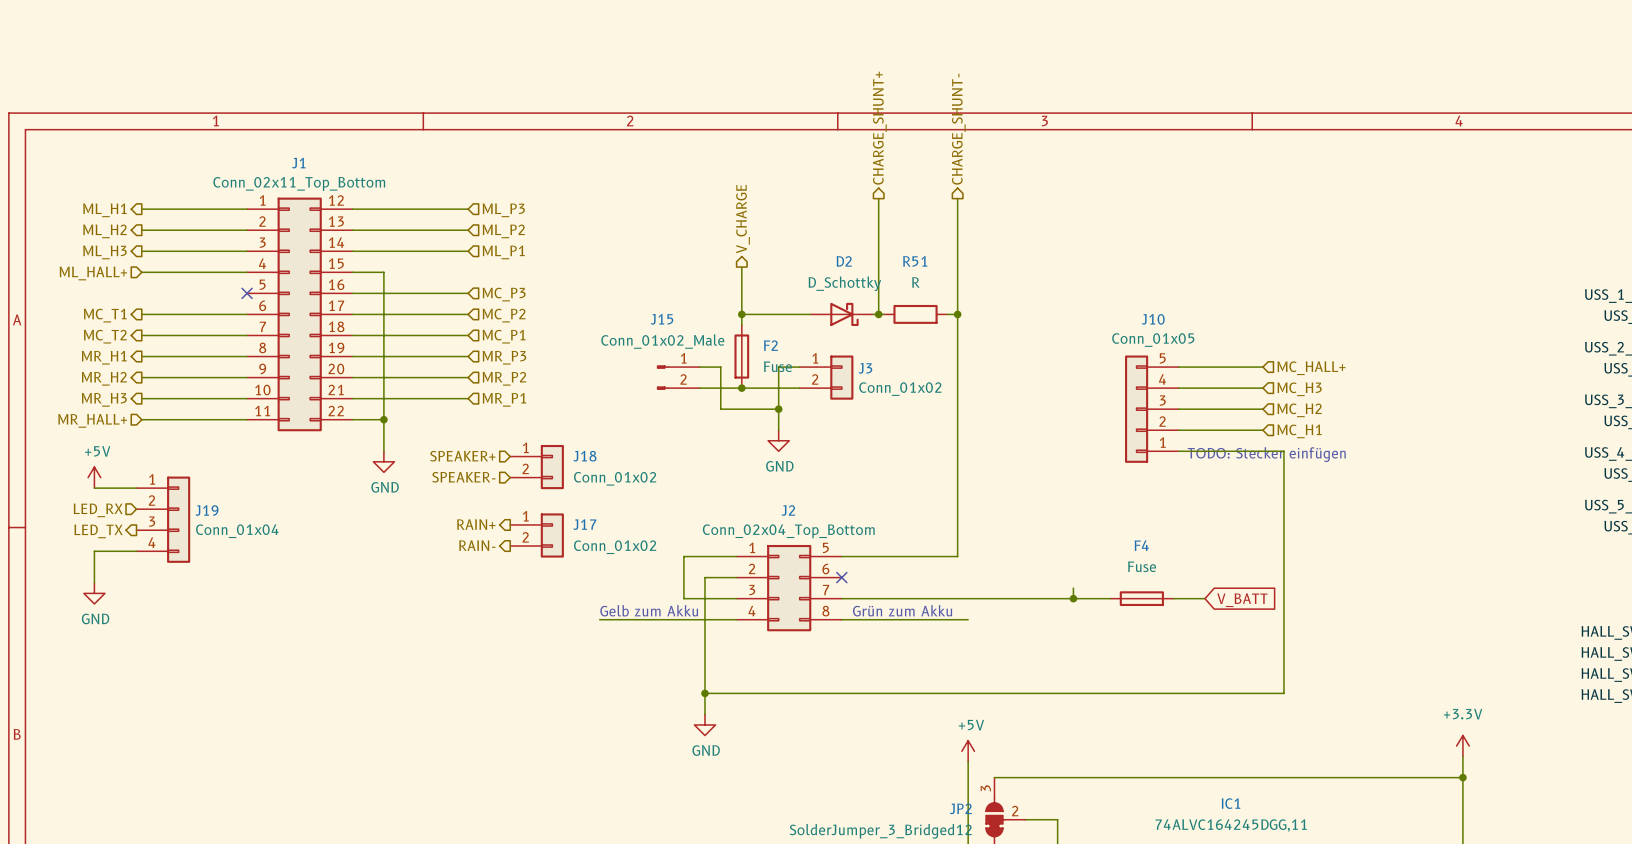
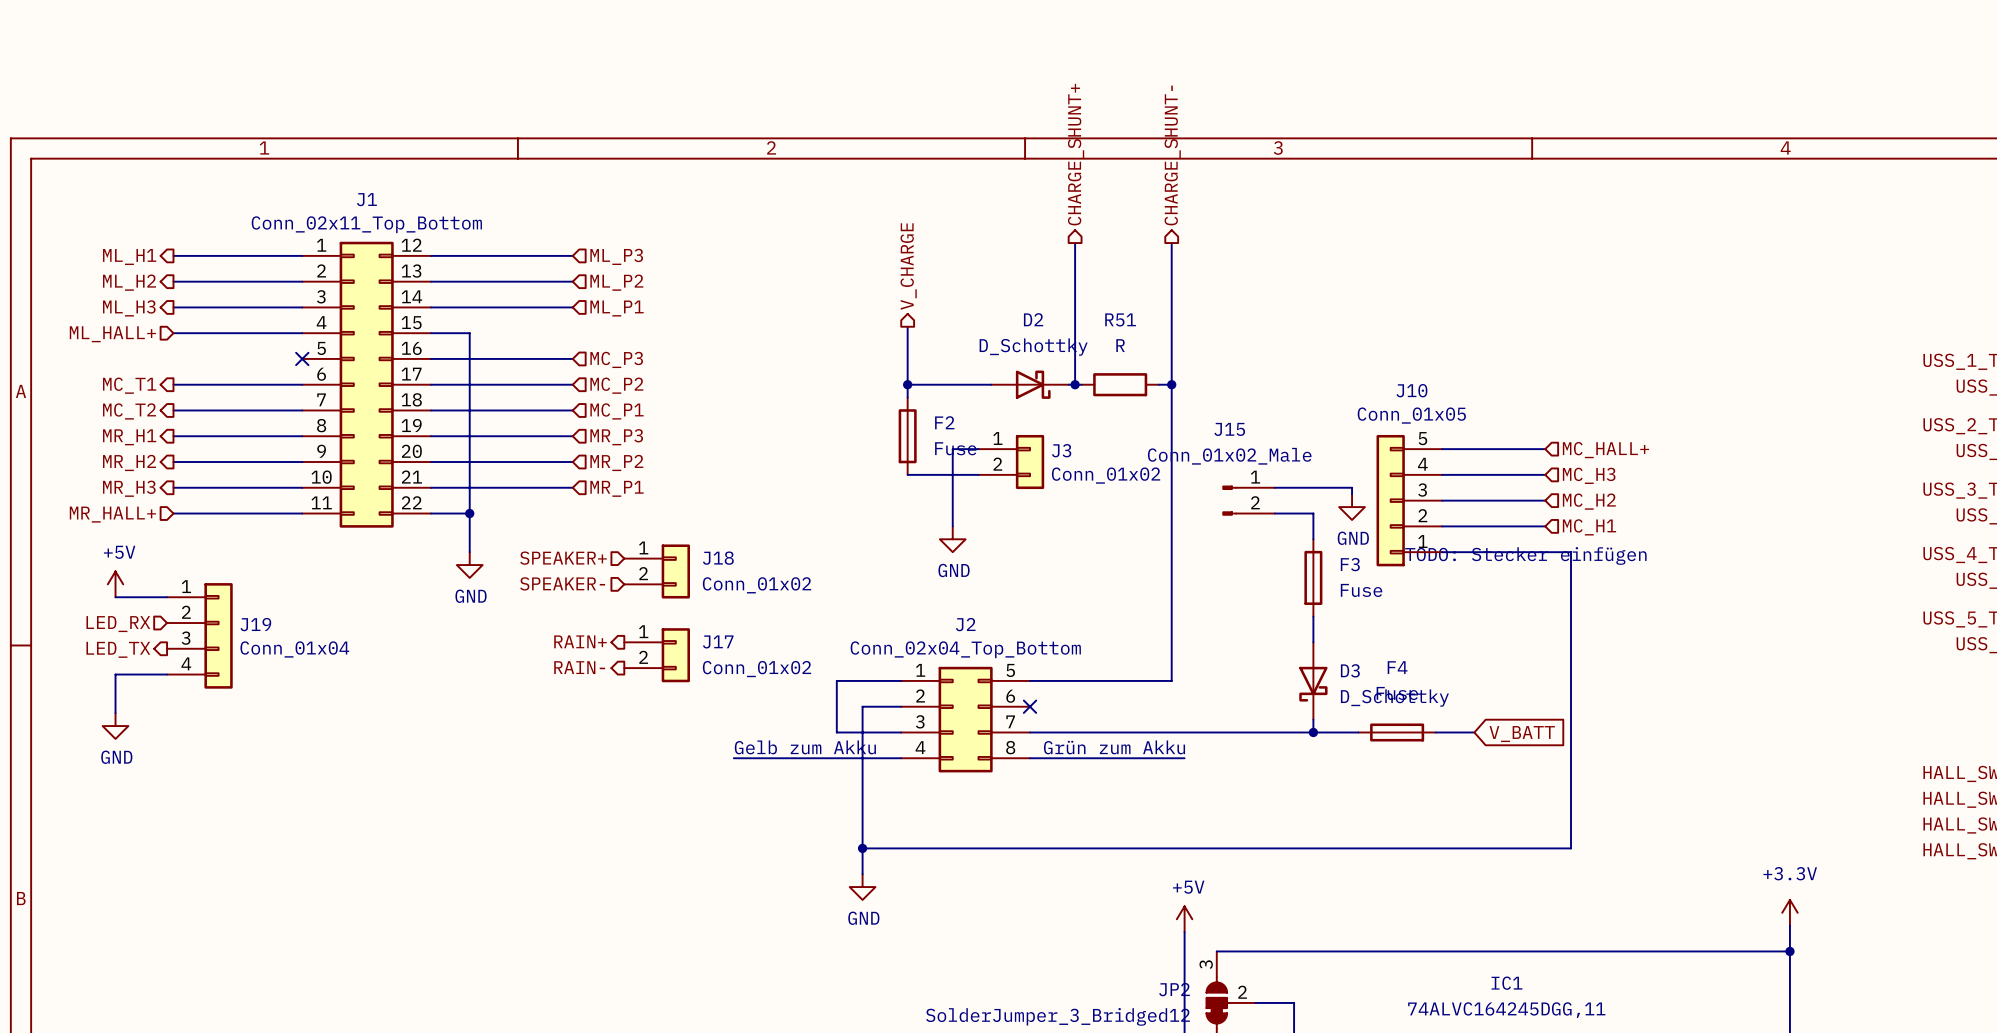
wire: (699, 367) (720, 367) (720, 409) (778, 409) -> none
J15 position: (678, 377) -> (1248, 500)
wire: (699, 388) (741, 388) -> none
junction: (741, 388) -> none
wire: none -> (1274, 487) (1352, 487) (1352, 494)
junction: (778, 409) -> none
power symbol: none -> GND (1352, 507)
wire: none -> (1274, 513) (1313, 513) (1313, 539)
F3: none -> Fuse (1313, 577)
wire: none -> (1313, 616) (1313, 642)
D3: none -> D_Schottky (1313, 680)

